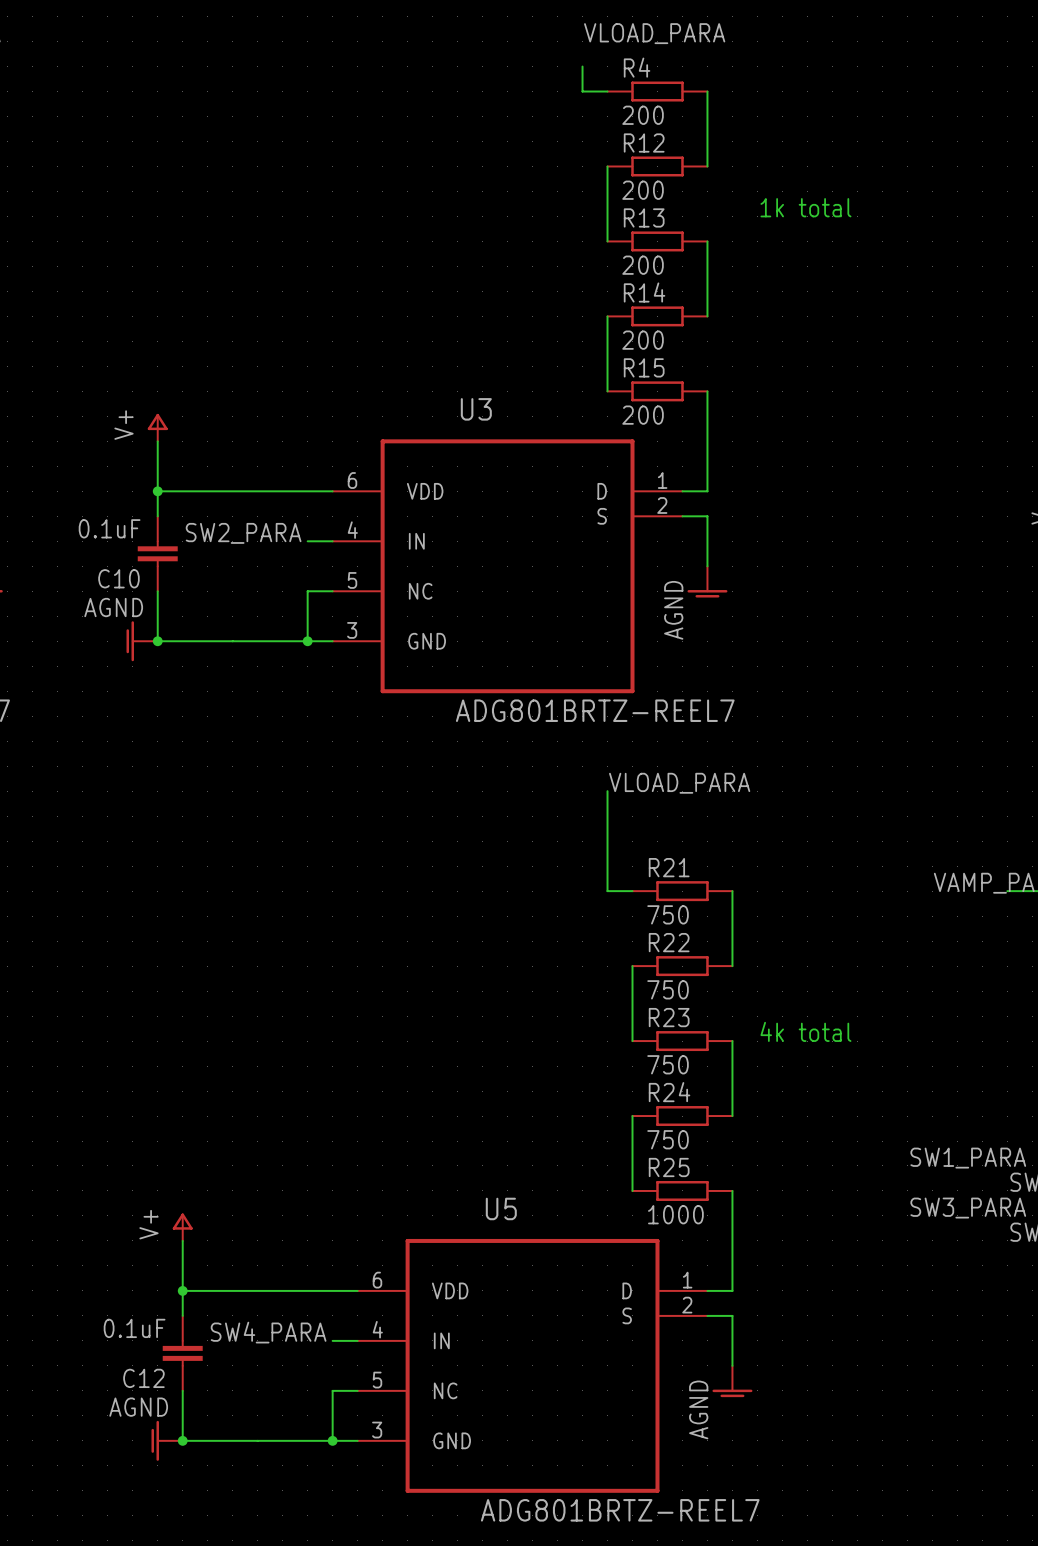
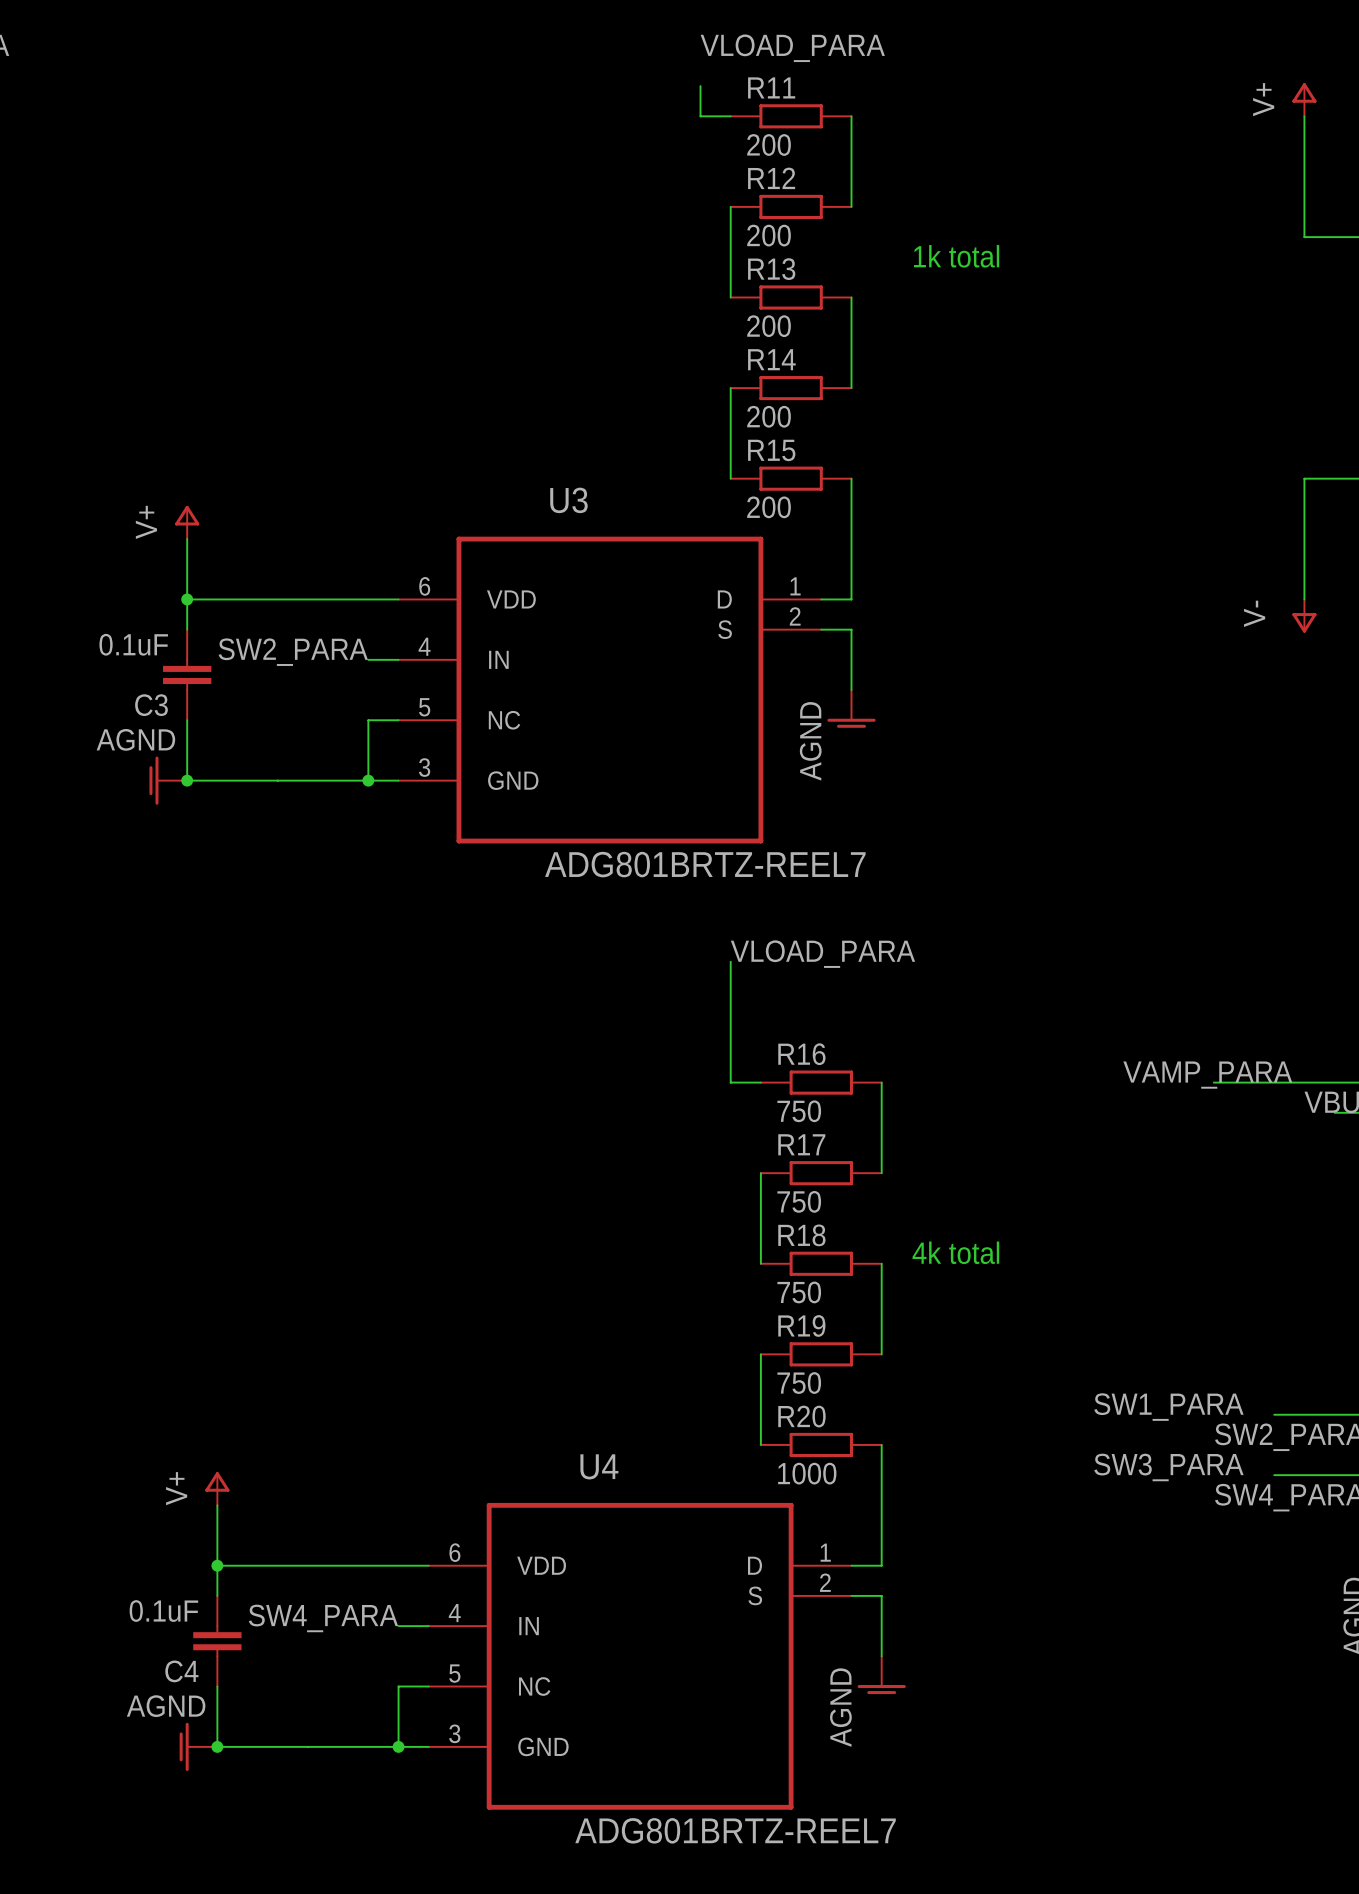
R4 name: R4 (637, 67) -> R11 (771, 87)
C10 name: C10 (118, 578) -> C3 (151, 705)
R21 name: R21 (669, 867) -> R16 (801, 1054)
R22 name: R22 (669, 942) -> R17 (801, 1144)
R23 name: R23 (669, 1017) -> R18 (801, 1235)
R24 name: R24 (669, 1092) -> R19 (801, 1325)
R25 name: R25 (669, 1167) -> R20 (801, 1416)
U5 name: U5 (501, 1208) -> U4 (599, 1466)
C12 name: C12 (143, 1378) -> C4 (181, 1671)

